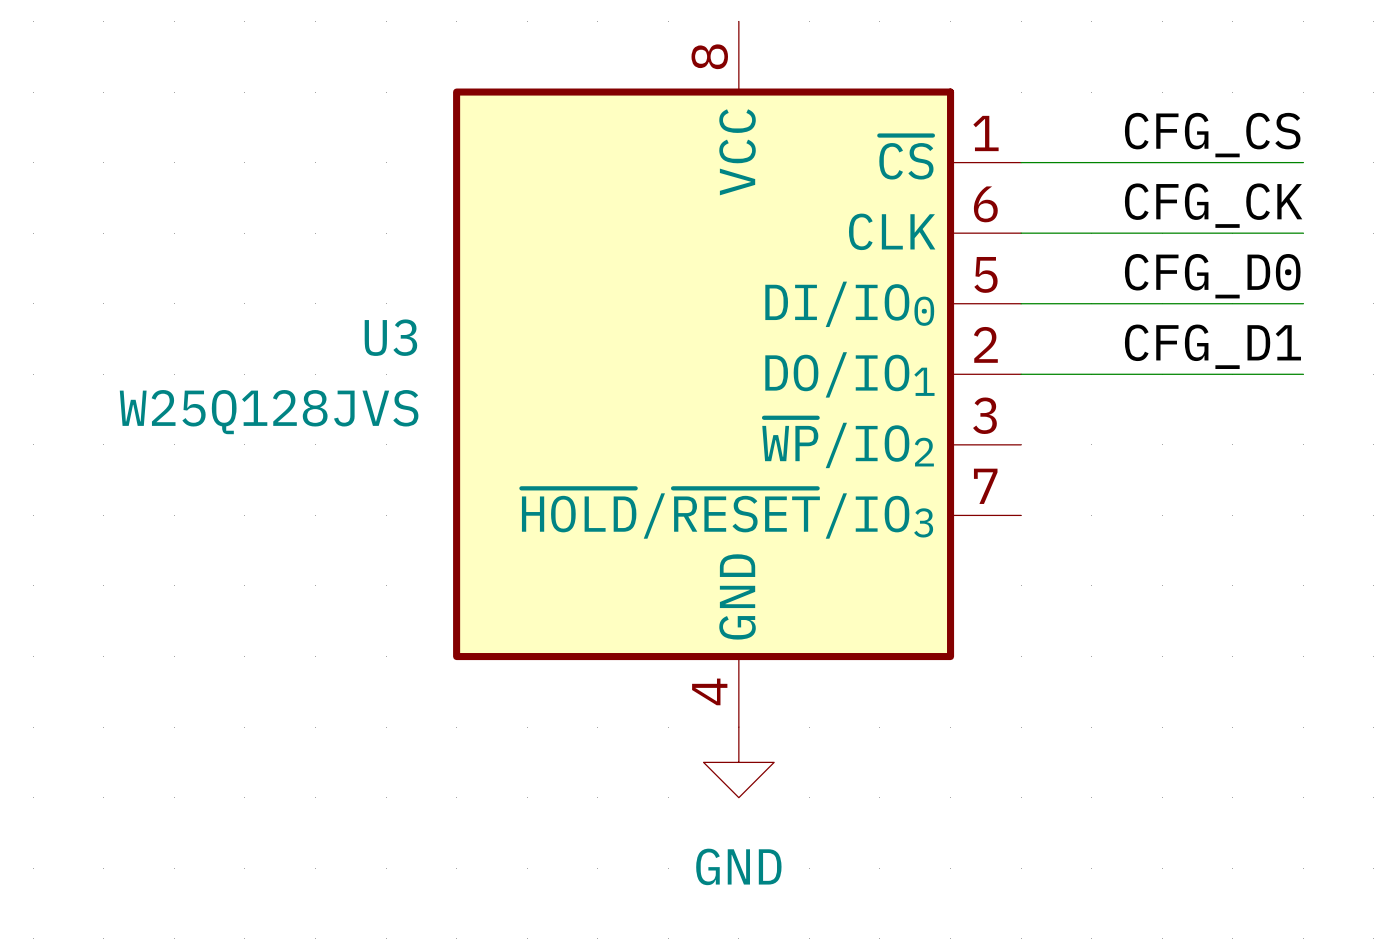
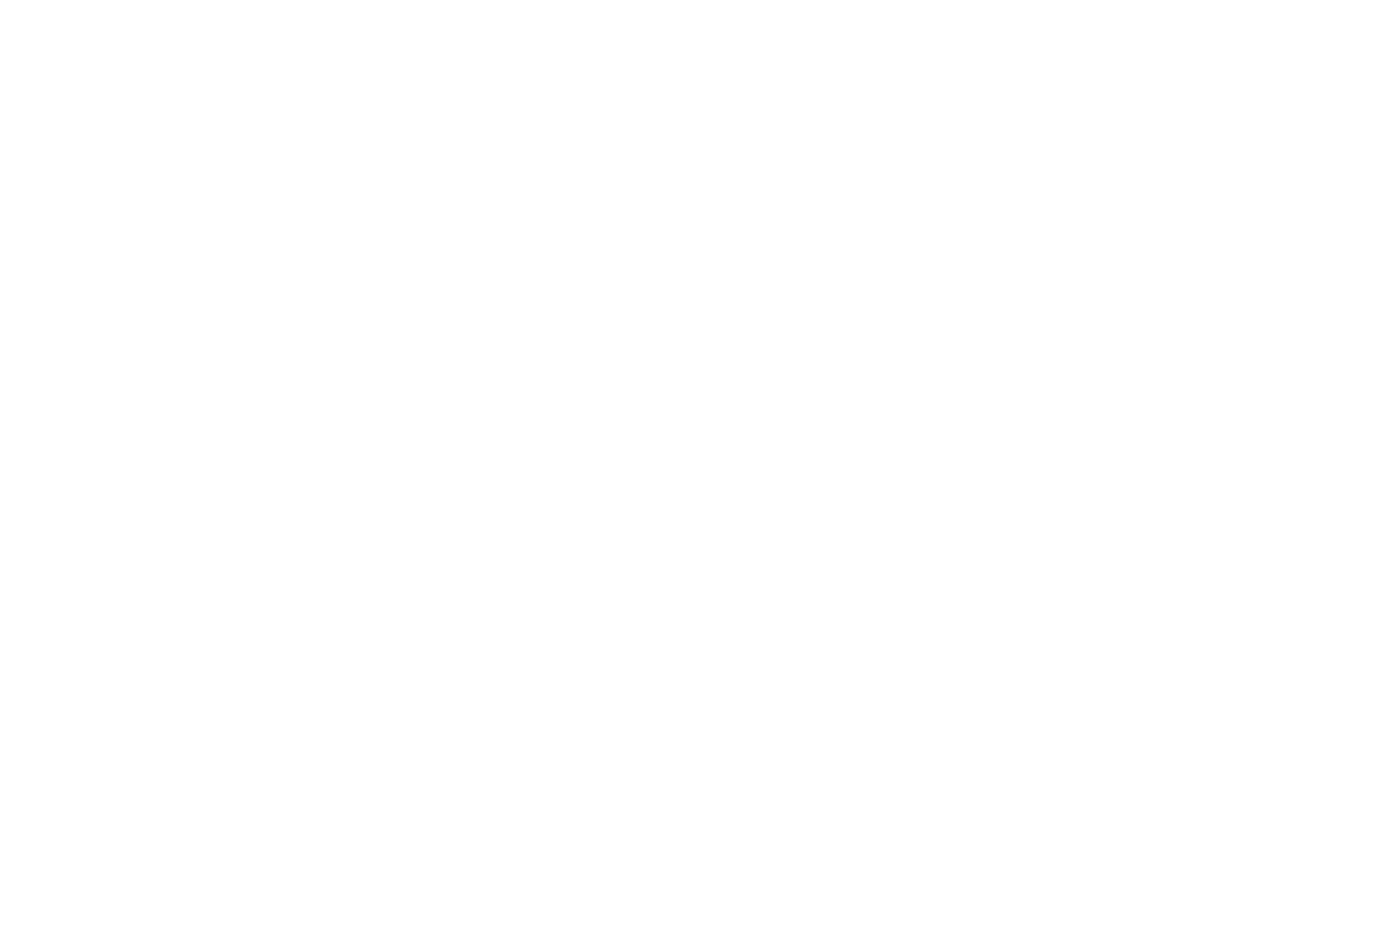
label: CFG_CS (1212, 135) -> none
wire: (1021, 162) (1303, 162) -> none
label: CFG_CK (1213, 205) -> none
wire: (1021, 233) (1303, 233) -> none
label: CFG_D0 (1212, 276) -> none
wire: (1021, 303) (1303, 303) -> none
label: CFG_D1 (1212, 346) -> none
U3: W25Q128JVS (737, 374) -> none
wire: (1021, 374) (1303, 374) -> none
power symbol: GND (738, 762) -> none

